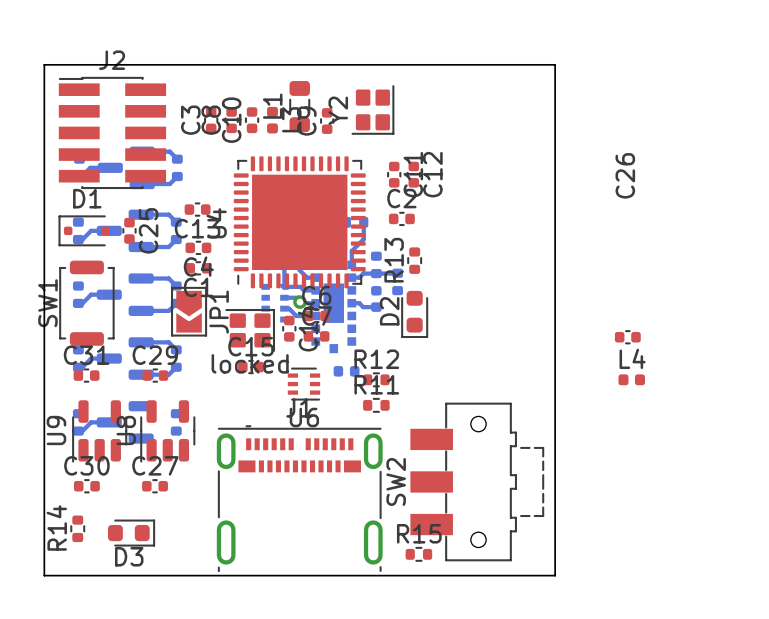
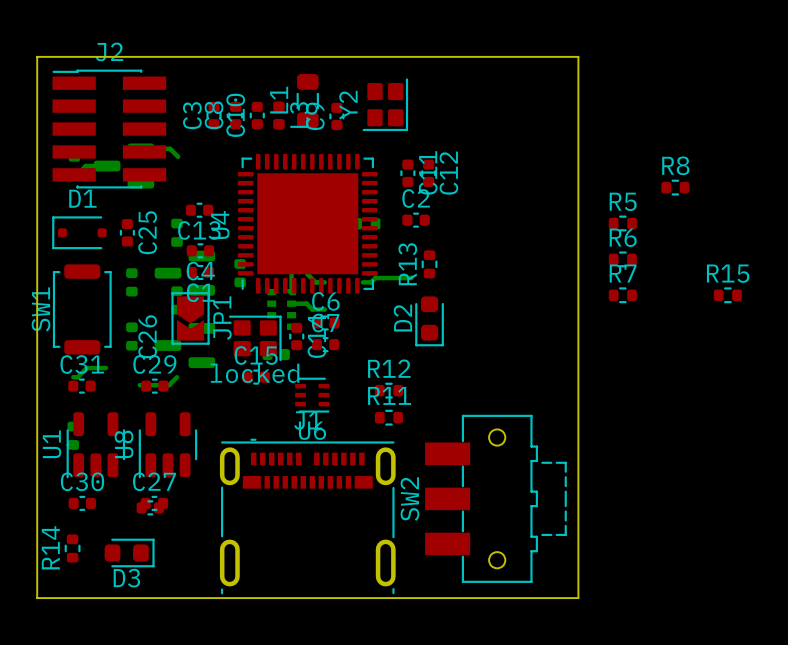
part: (177, 167) -> none
bottom track: (177, 176) (169, 184) (142, 184) -> none
R8: none -> (675, 187)
bottom track: (141, 214) (168, 214) (176, 222) -> none
bottom track: (363, 222) (363, 239) (351, 251) (351, 264) -> none
R5: none -> (622, 223)
part: (78, 230) -> none
bottom track: (109, 230) (91, 230) (82, 239) (78, 239) -> none
part: (125, 230) -> none
bottom track: (176, 239) (168, 247) (141, 247) -> none
R6: none -> (622, 259)
part: (376, 264) -> none
part: none -> (184, 273)
part: none -> (240, 273)
part: none -> (131, 282)
bottom track: (141, 278) (168, 278) (176, 286) -> none
part: (397, 281) -> none
bottom track: (287, 286) (300, 286) (303, 290) (315, 290) -> none
R7: none -> (622, 295)
part: (78, 294) -> none
bottom track: (109, 294) (91, 294) (82, 303) (78, 303) -> none
part: (125, 294) -> none
part: (376, 298) -> none
via: (300, 302) -> none
bottom track: (176, 303) (168, 310) (141, 310) -> none
part: (333, 303) -> none
bottom track: (351, 303) (359, 303) (363, 307) (376, 307) -> none
bottom track: (284, 308) (289, 308) (296, 315) (315, 315) -> none
part: none -> (131, 336)
part: none -> (184, 345)
C26 position: (627, 337) -> (150, 507)
bottom track: (141, 342) (168, 342) (176, 349) -> none
part: none -> (276, 354)
part: (78, 358) -> none
part: (125, 358) -> none
part: (176, 358) -> none
part: (346, 371) -> none
L4: (631, 379) -> none
bottom track: (109, 422) (91, 422) (82, 431) (78, 431) -> none
part: (125, 422) -> none
part: (176, 422) -> none
U9 name: U9 (56, 430) -> U1 (52, 444)
R15 position: (418, 554) -> (727, 295)

